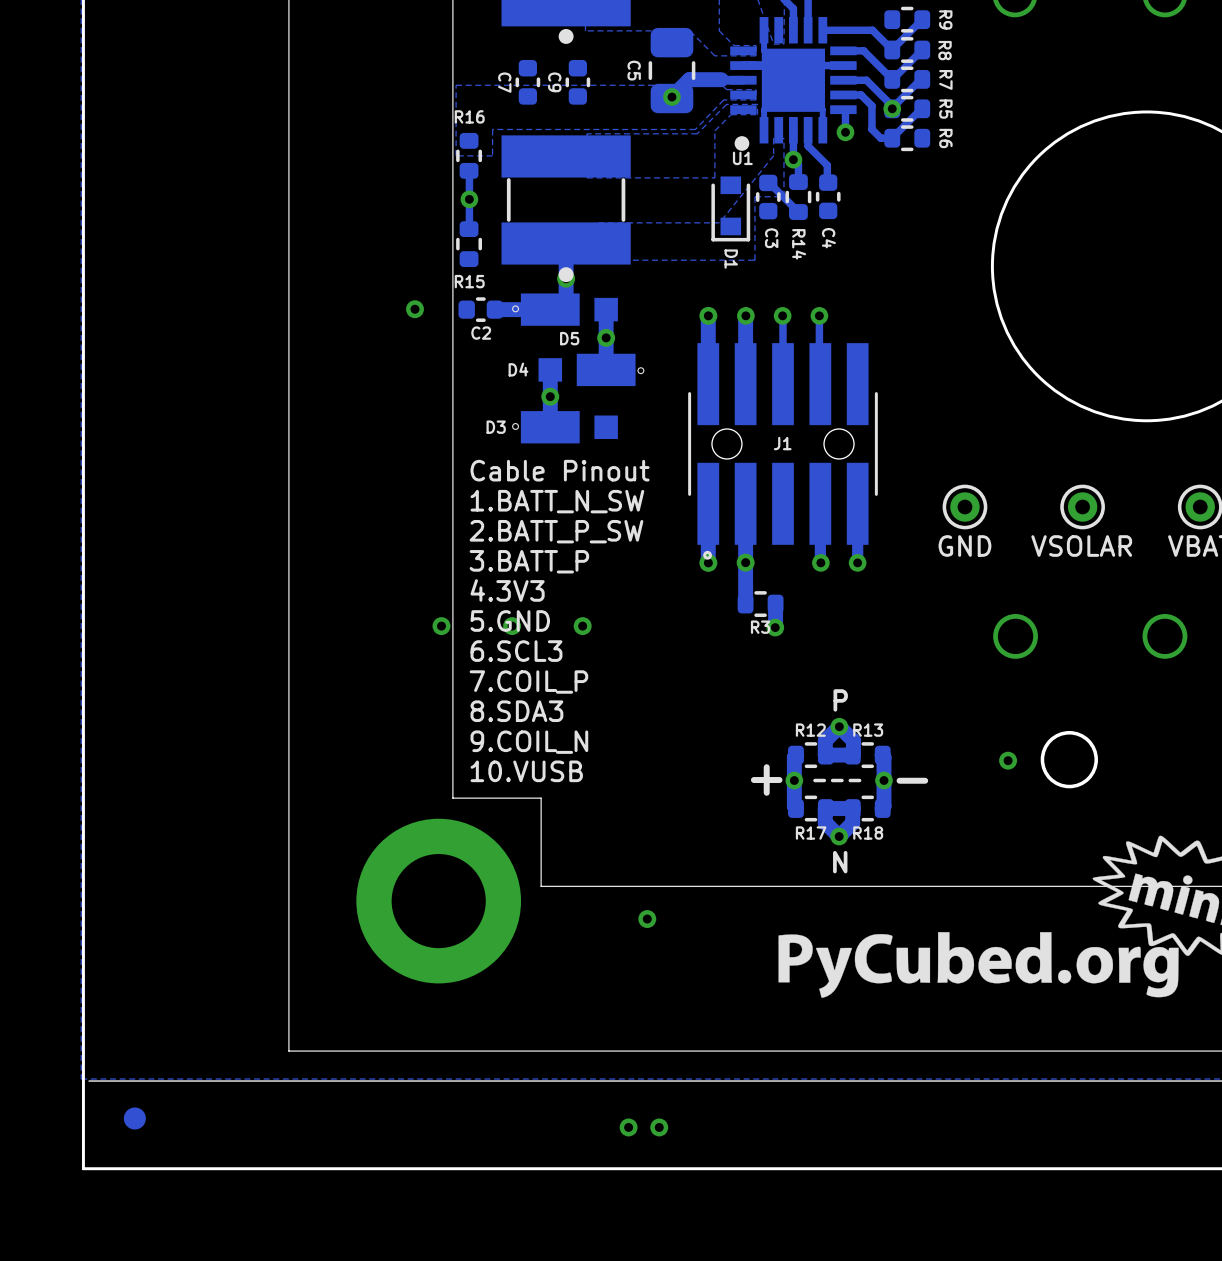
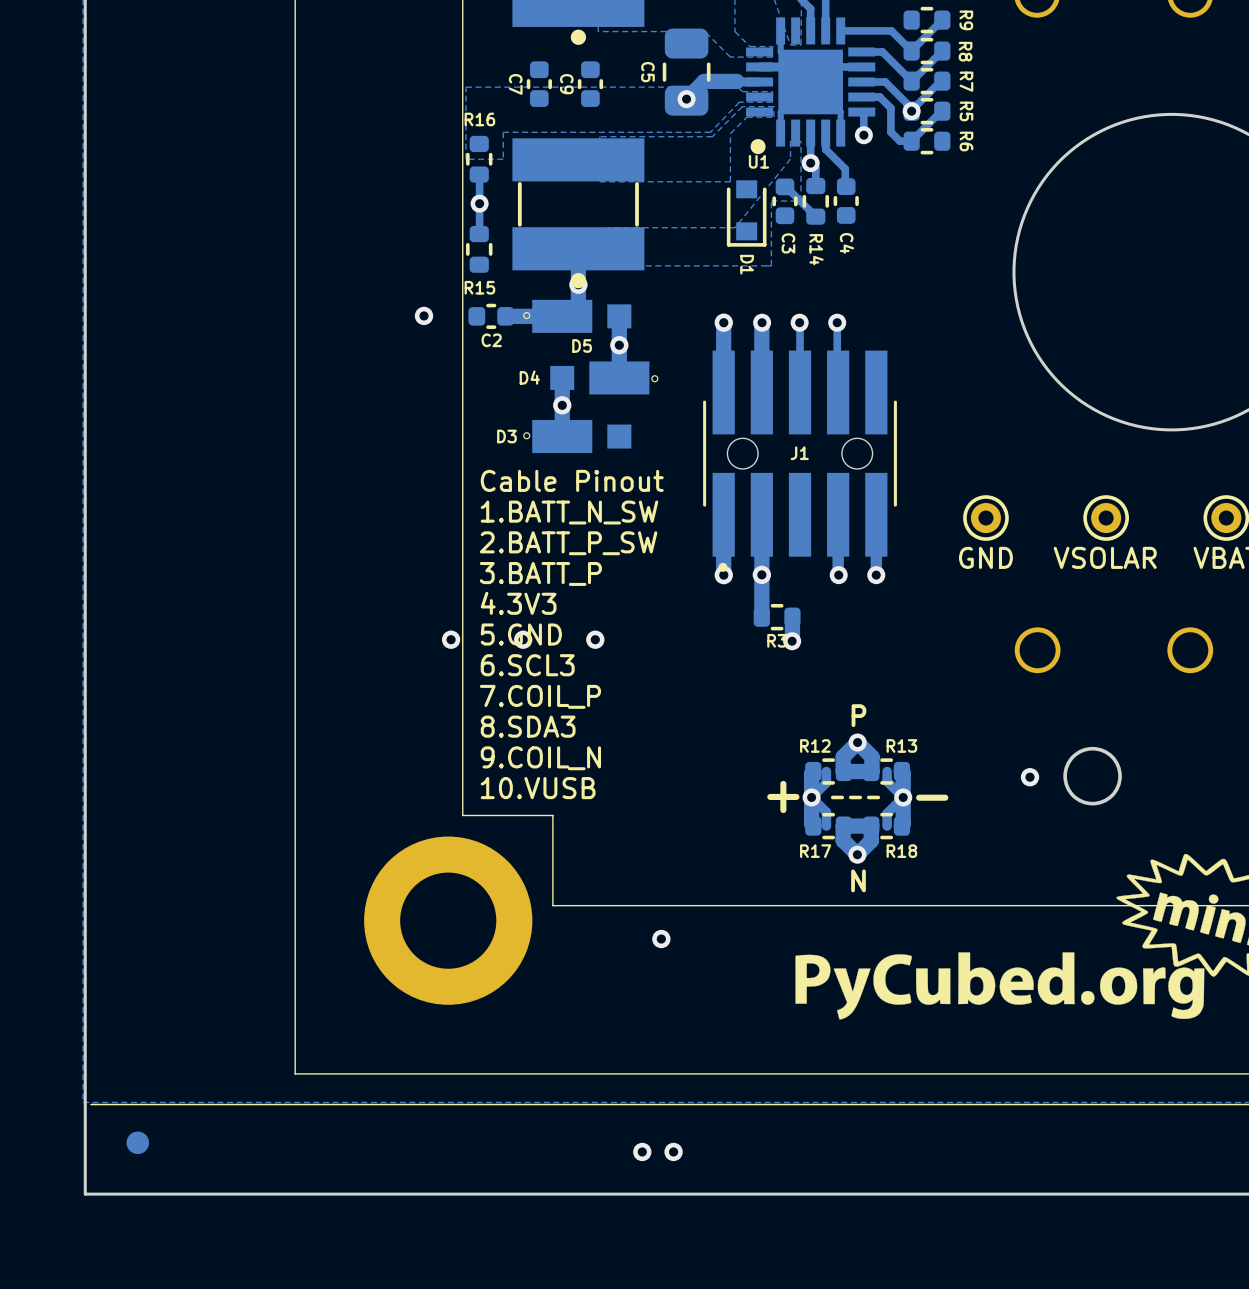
R12 name position: R12 (810, 730) -> R12 (815, 745)
R13 name position: R13 (868, 730) -> R13 (901, 745)
track: none -> (826, 771) (826, 782) (811, 797) (826, 812) (826, 826)
track: none -> (887, 771) (887, 781) (903, 797) (887, 813) (887, 826)
R17 name position: R17 (811, 833) -> R17 (815, 851)
R18 name position: R18 (868, 833) -> R18 (901, 851)

